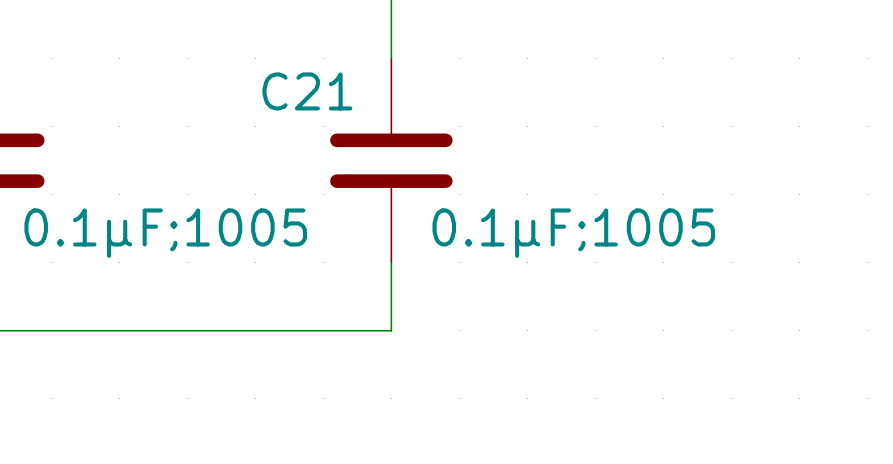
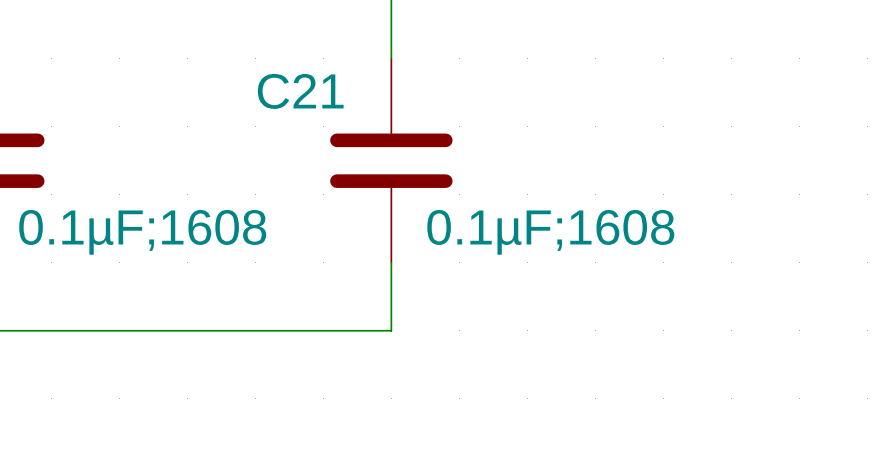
part value: 0.1µF;1005 (165, 233) -> 0.1µF;1608 (142, 232)
C21 value: 0.1µF;1005 (573, 233) -> 0.1µF;1608 (550, 232)

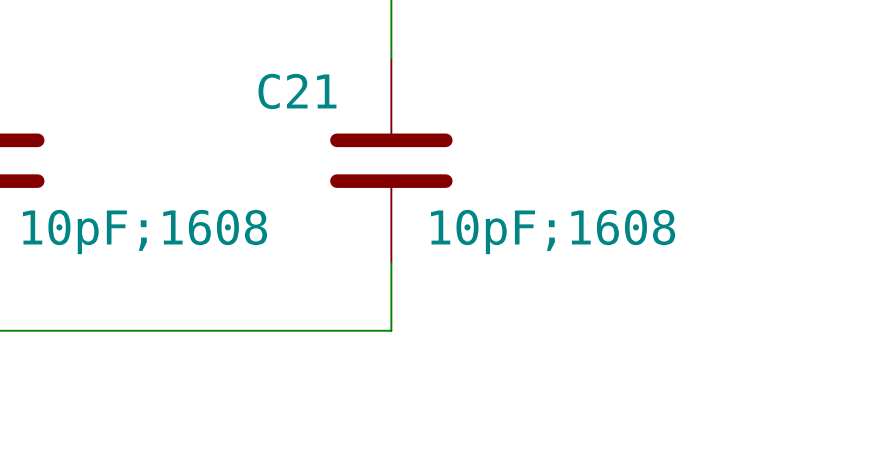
part value: 0.1µF;1608 (142, 232) -> 10pF;1608 (144, 232)
C21 value: 0.1µF;1608 (550, 232) -> 10pF;1608 (553, 232)

